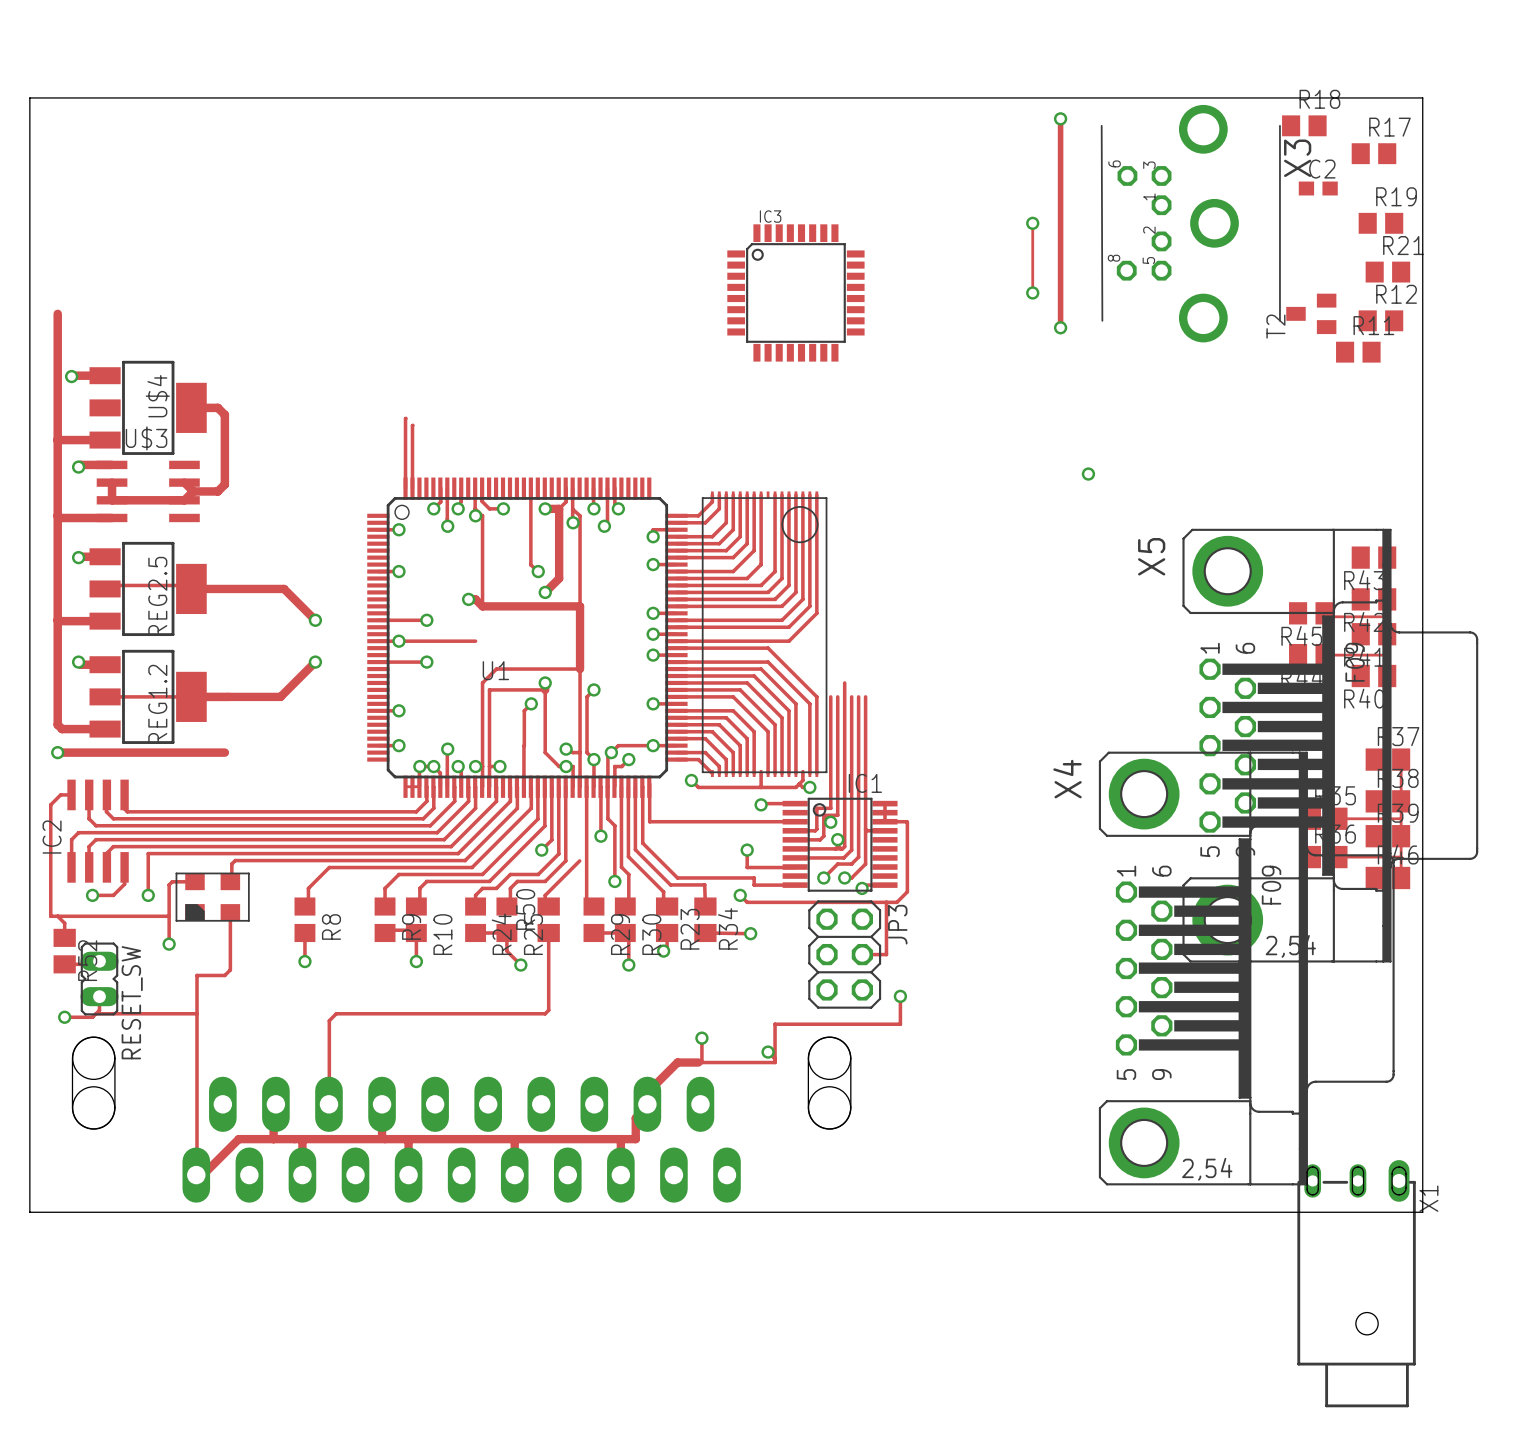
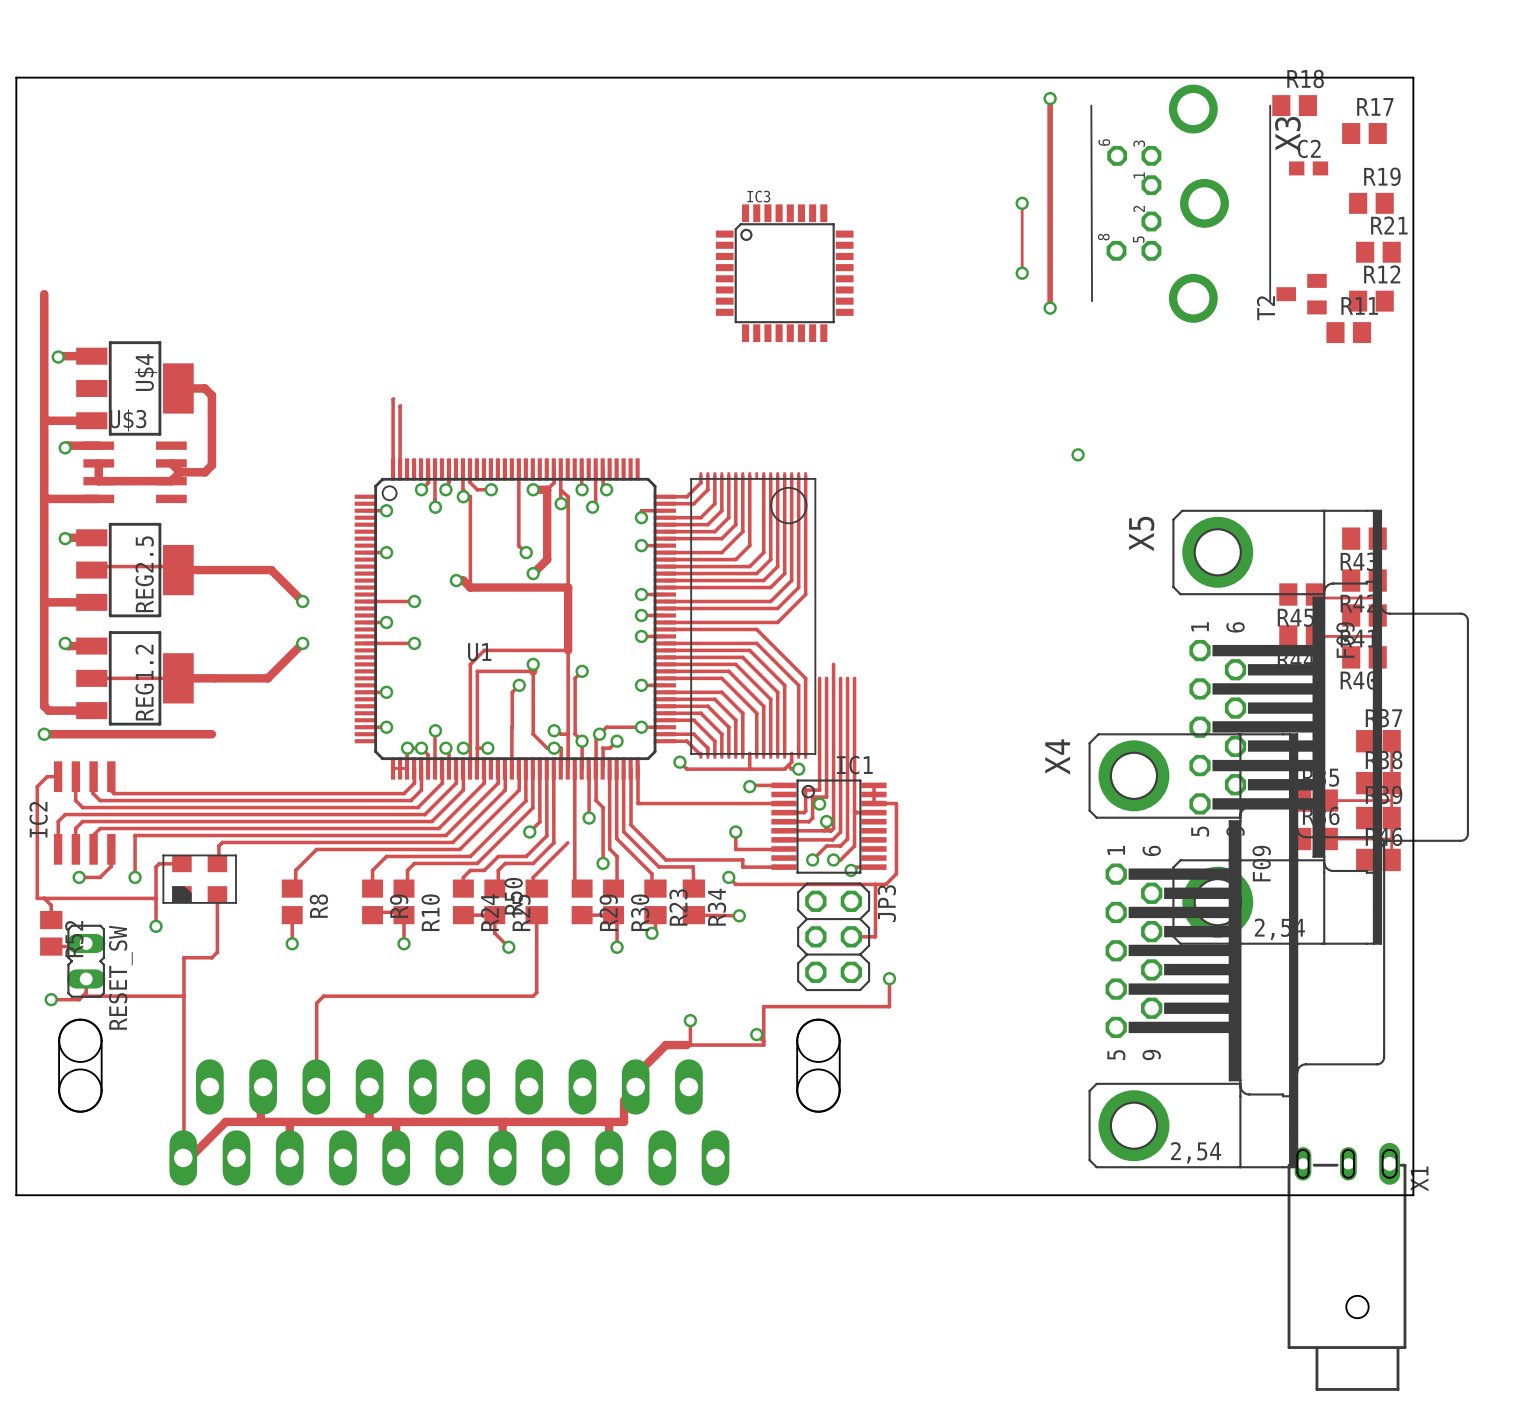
track: (398, 641) (475, 641) -> none

